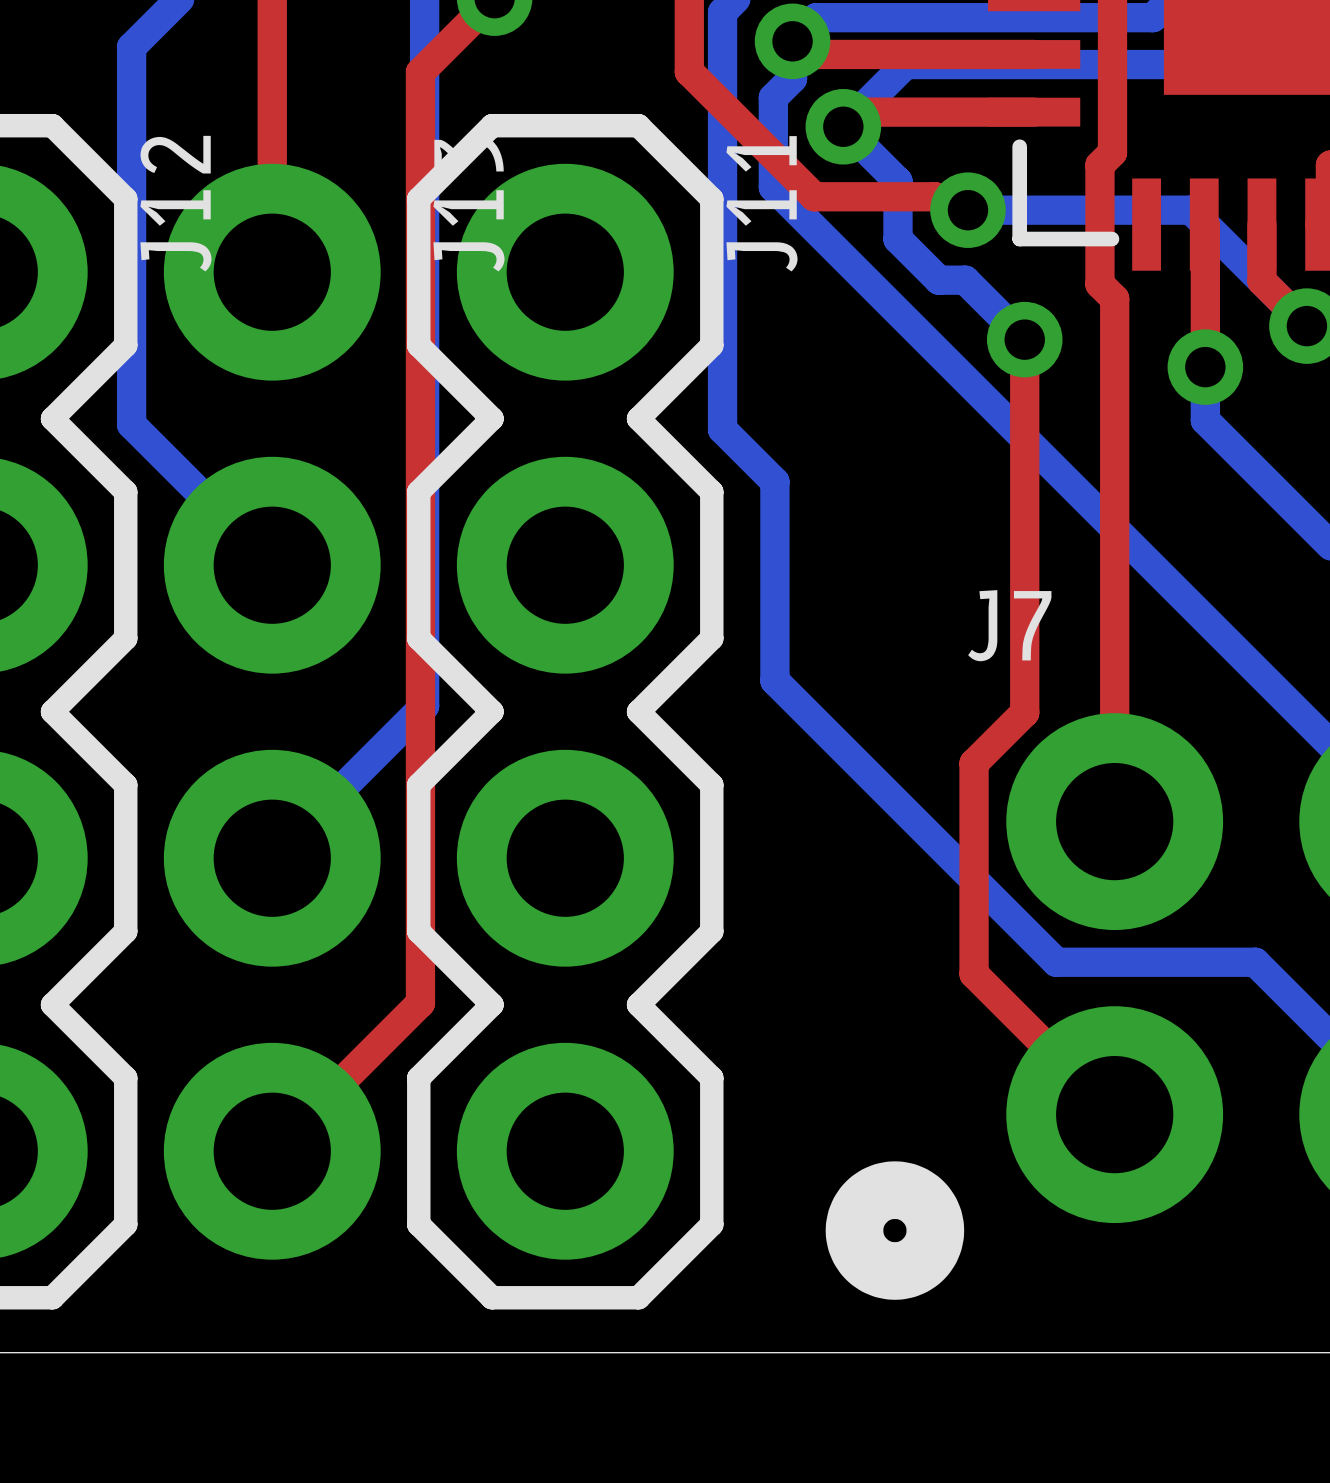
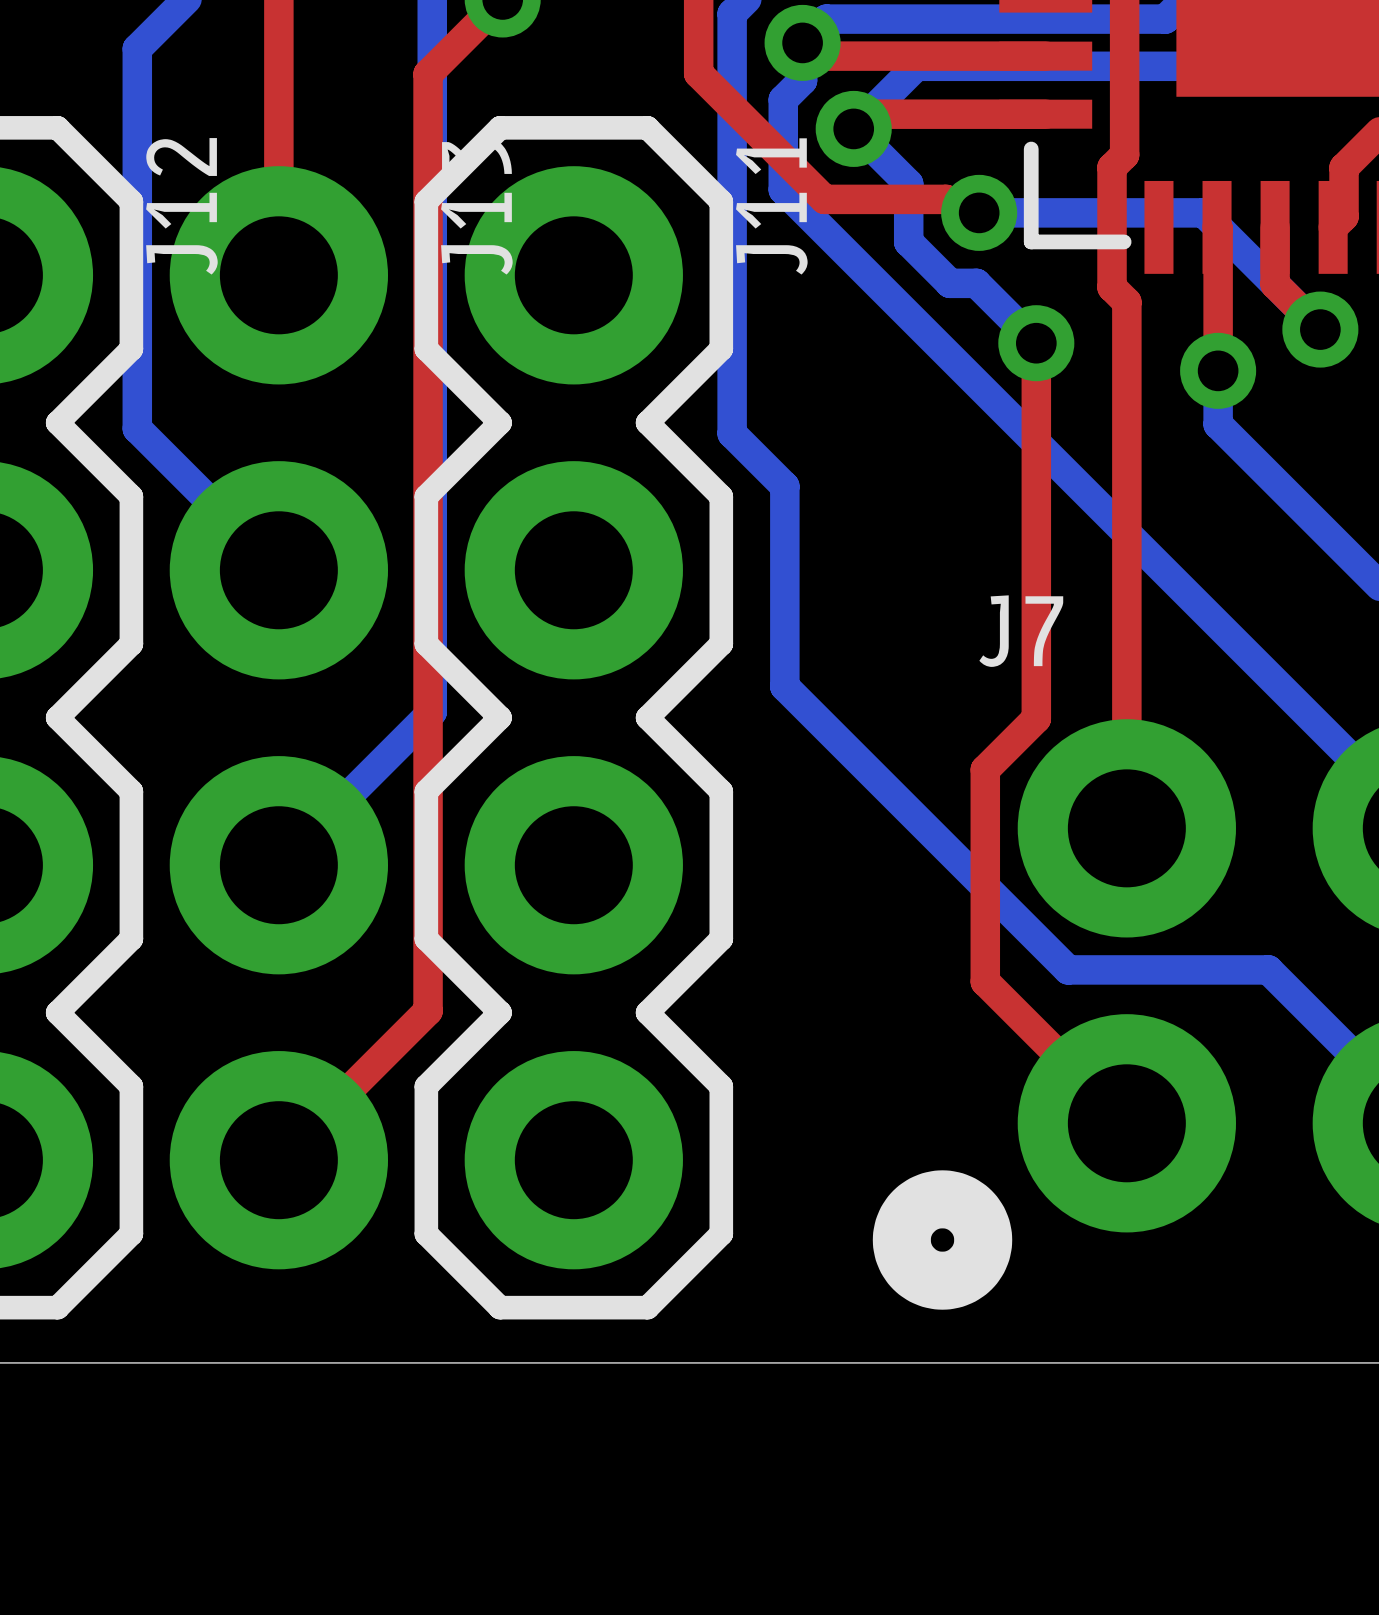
drawing position: (894, 1230) -> (942, 1240)

